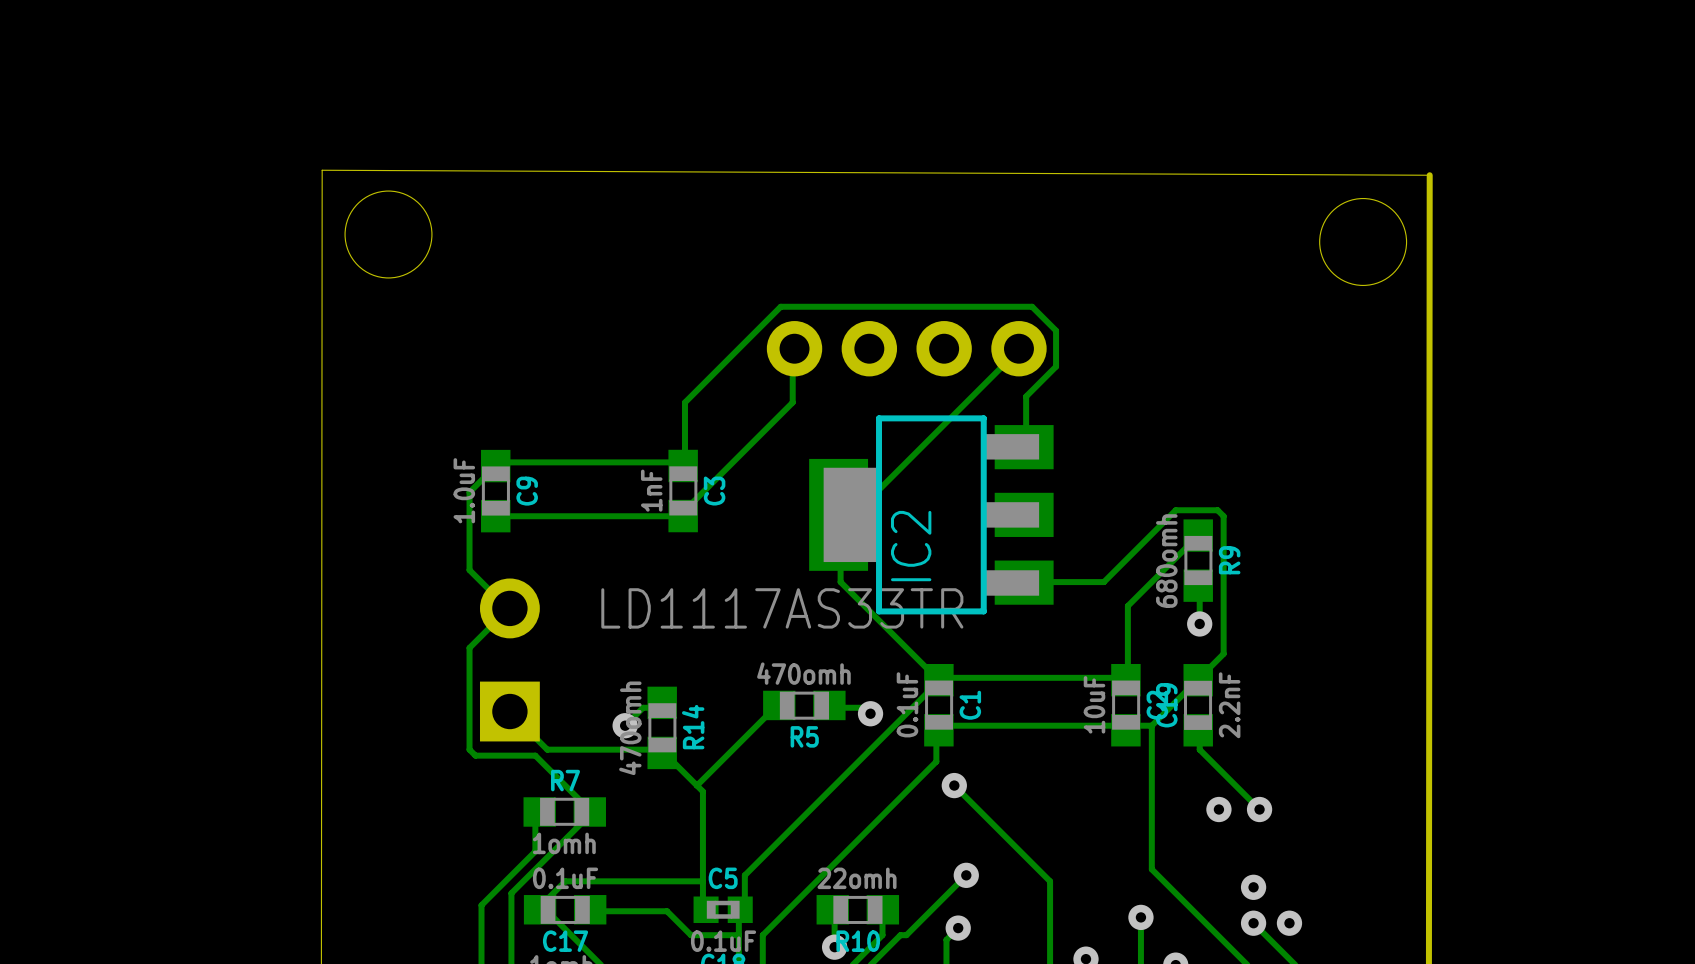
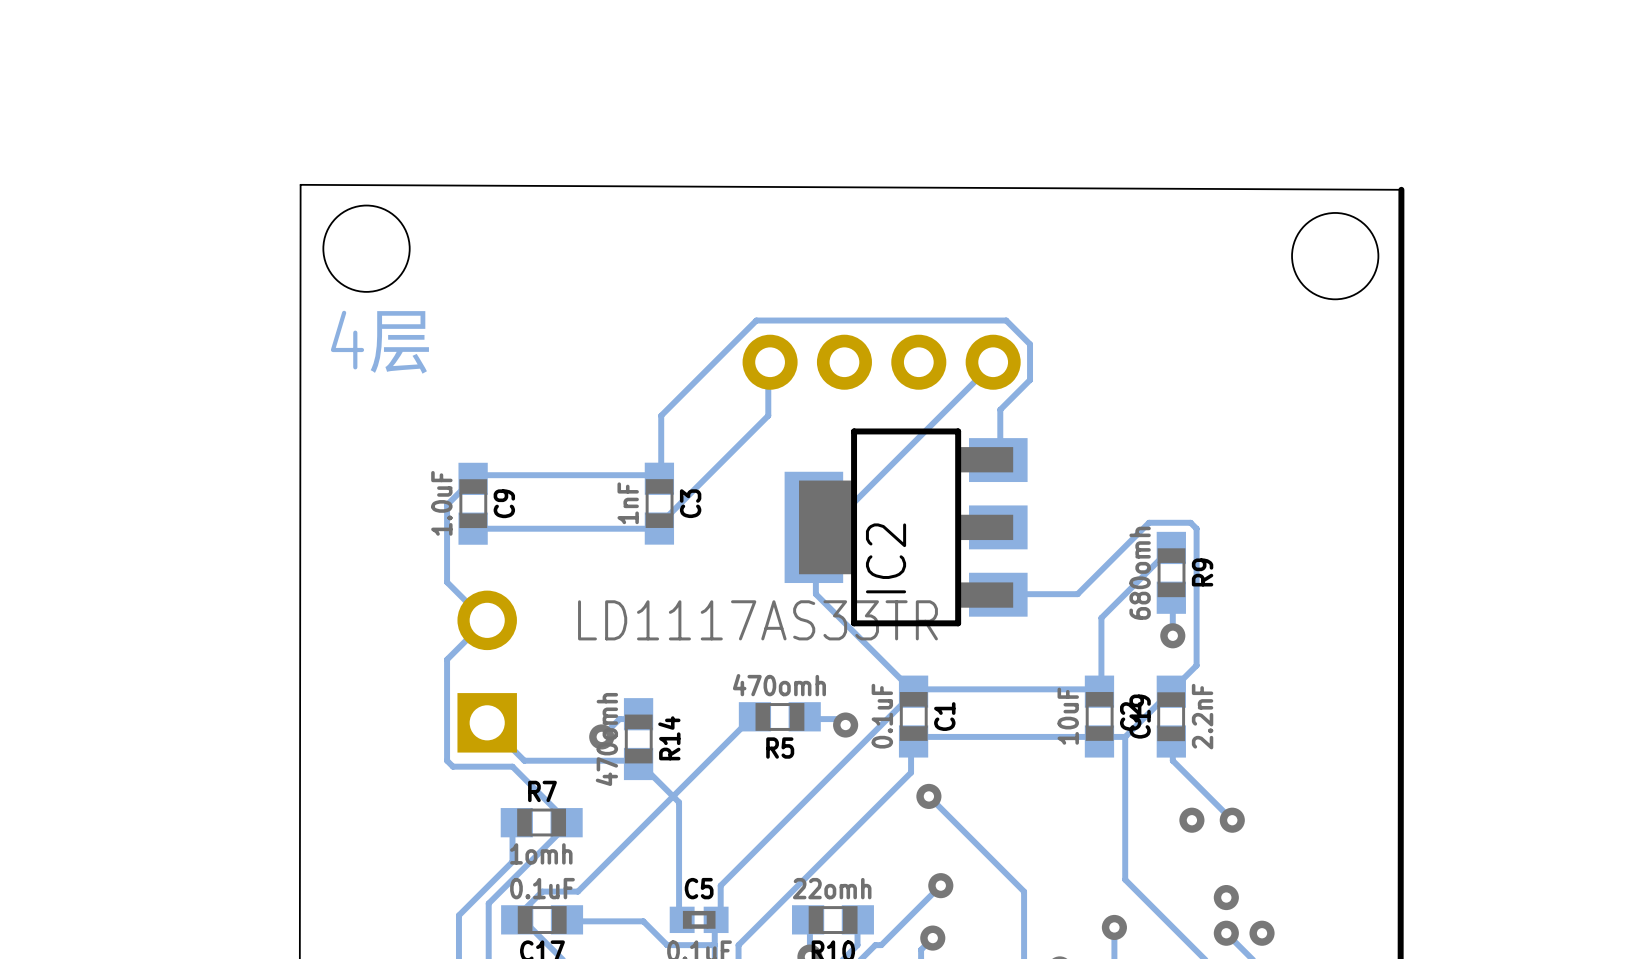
text: none -> 4层 (380, 342)
track: (702, 881) (601, 881) -> (673, 796) (577, 891)

